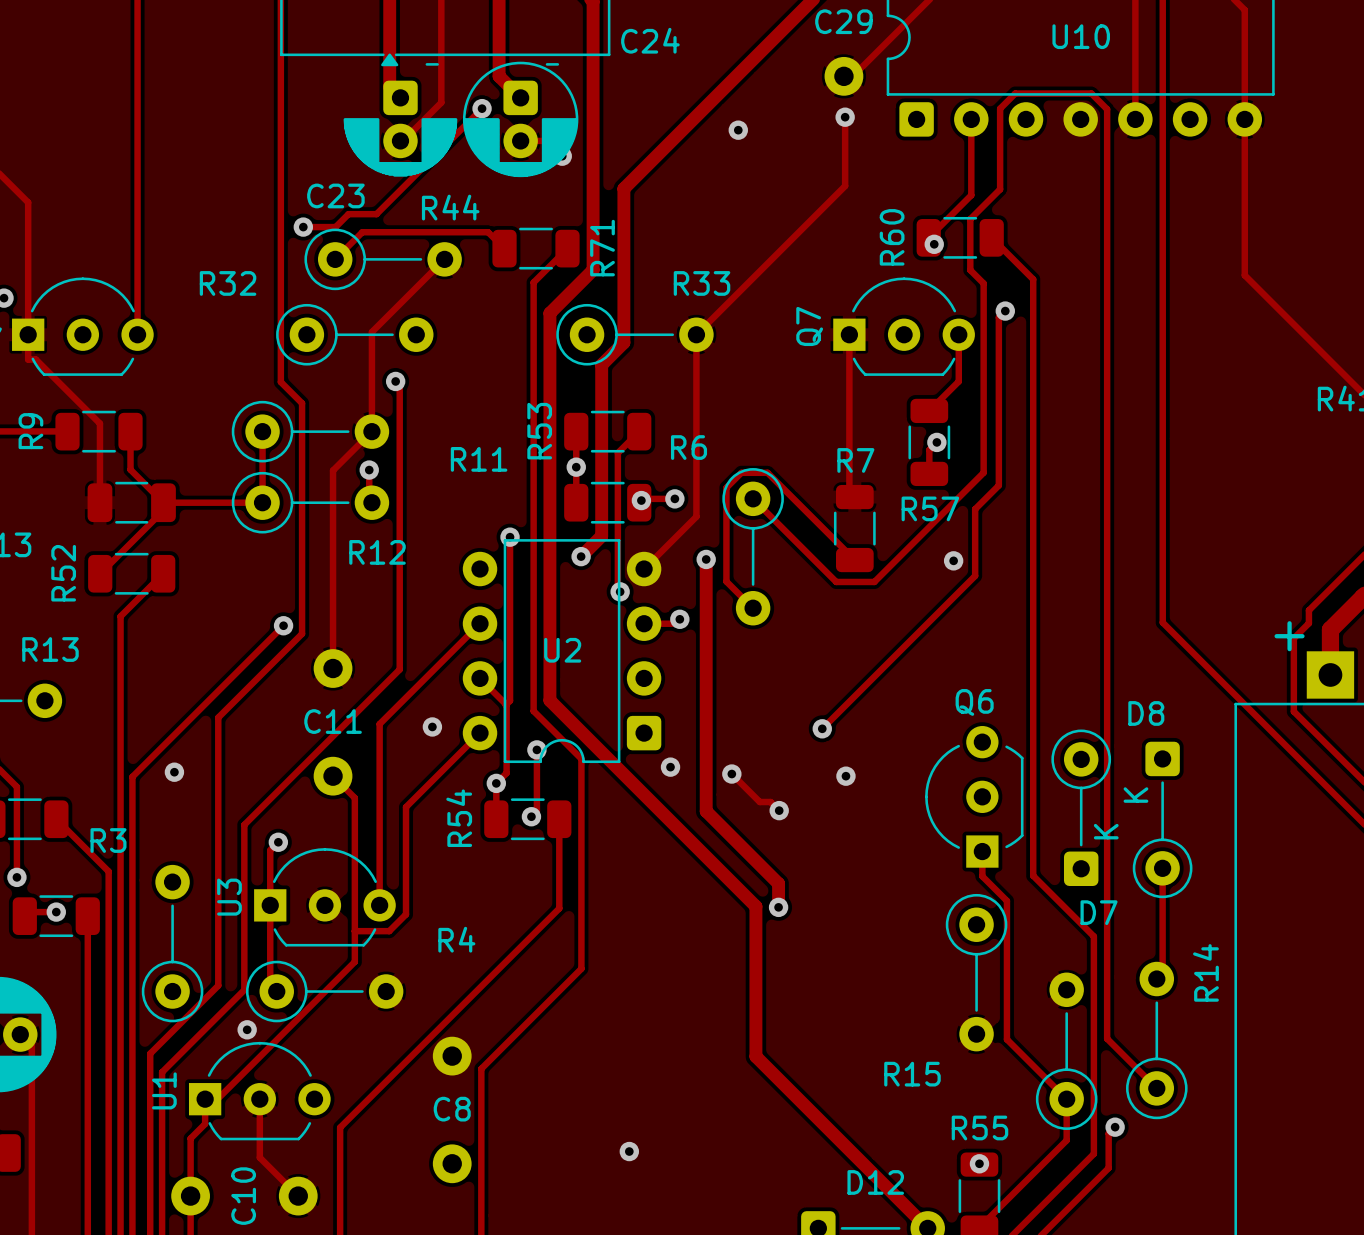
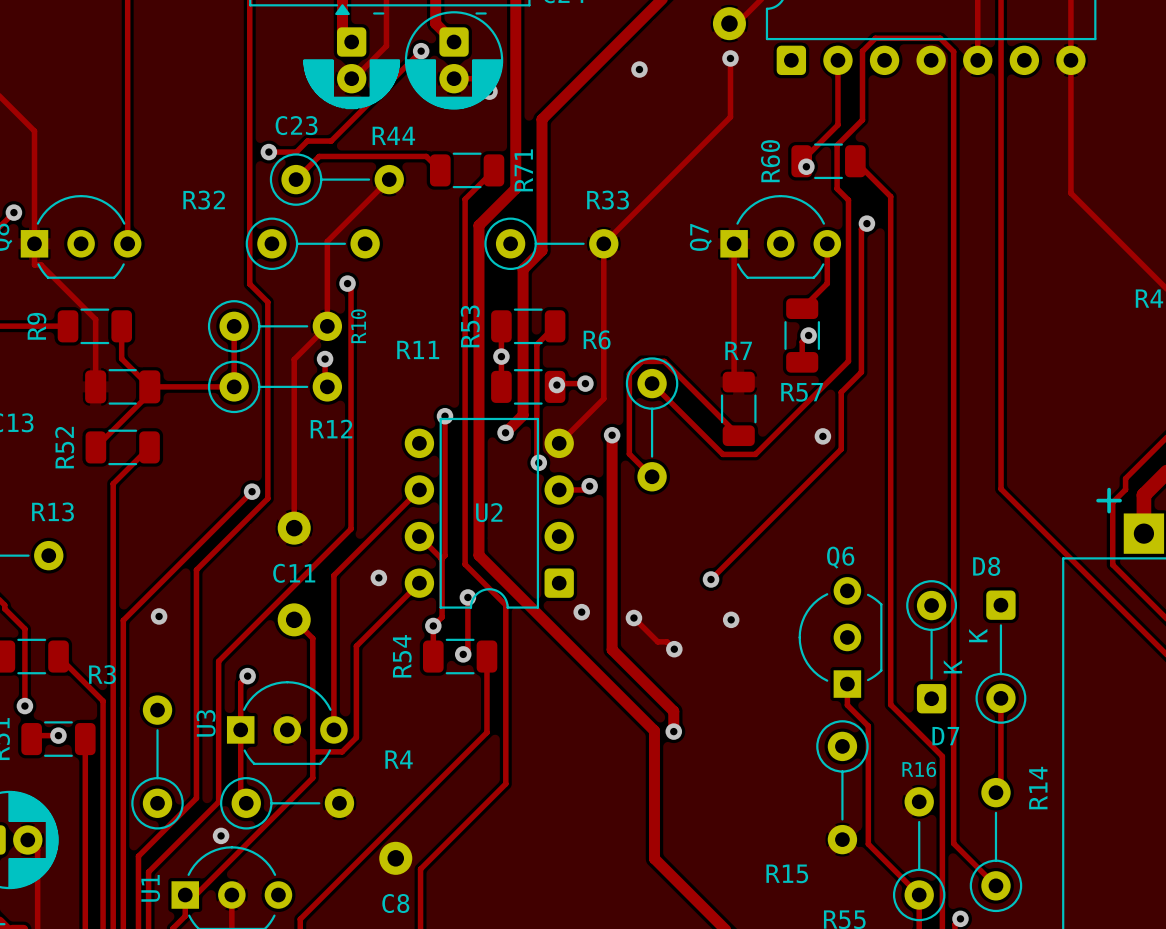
R10 name: none -> R10 (358, 326)
R16 name: none -> R16 (919, 769)

